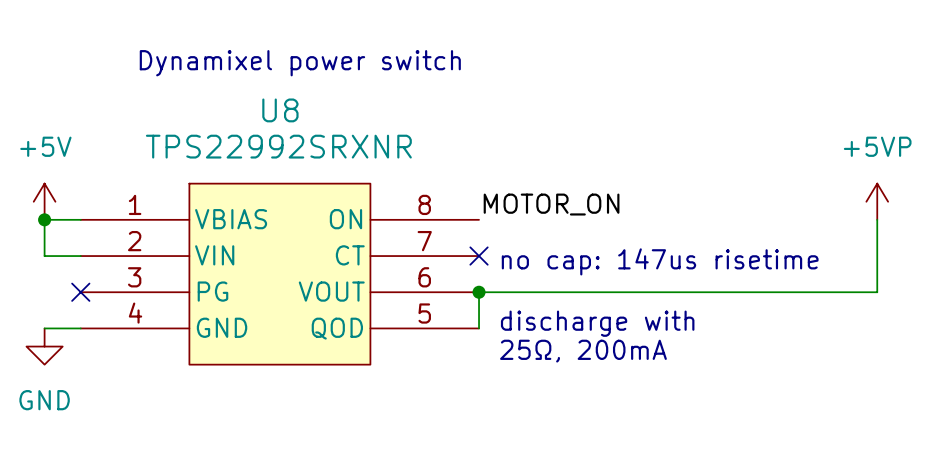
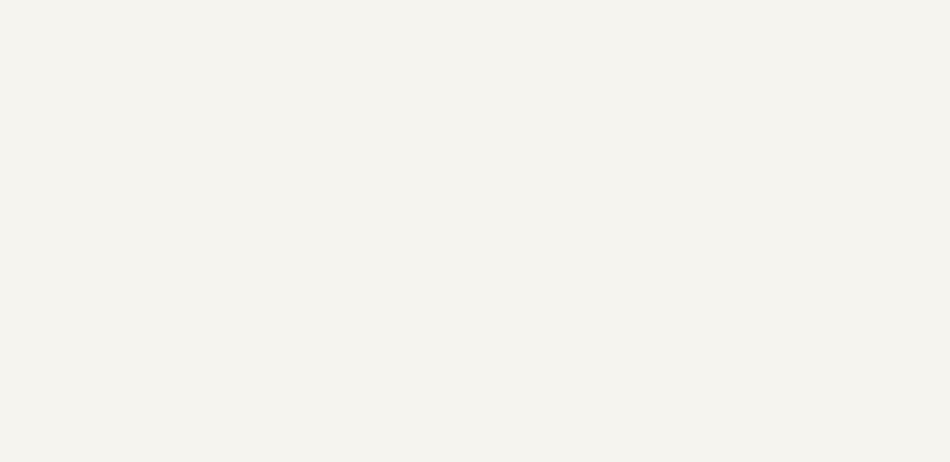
text: Dynamixel power switch (300, 63) -> none
power symbol: +5V (44, 201) -> none
power symbol: +5VP (877, 201) -> none
label: MOTOR_ON (551, 204) -> none
junction: (44, 219) -> none
wire: (80, 219) (44, 219) (44, 256) (80, 256) -> none
wire: (877, 219) (877, 292) (479, 292) (479, 328) -> none
no-connect mark: (479, 256) -> none
text: no cap: 147us risetime (660, 261) -> none
U8: TPS22992SRXNR (279, 274) -> none
no-connect mark: (80, 292) -> none
junction: (479, 292) -> none
text: discharge with (597, 323) -> none
wire: (44, 328) (80, 328) -> none
power symbol: GND (44, 346) -> none
text: 25Ω, 200mA (583, 351) -> none

